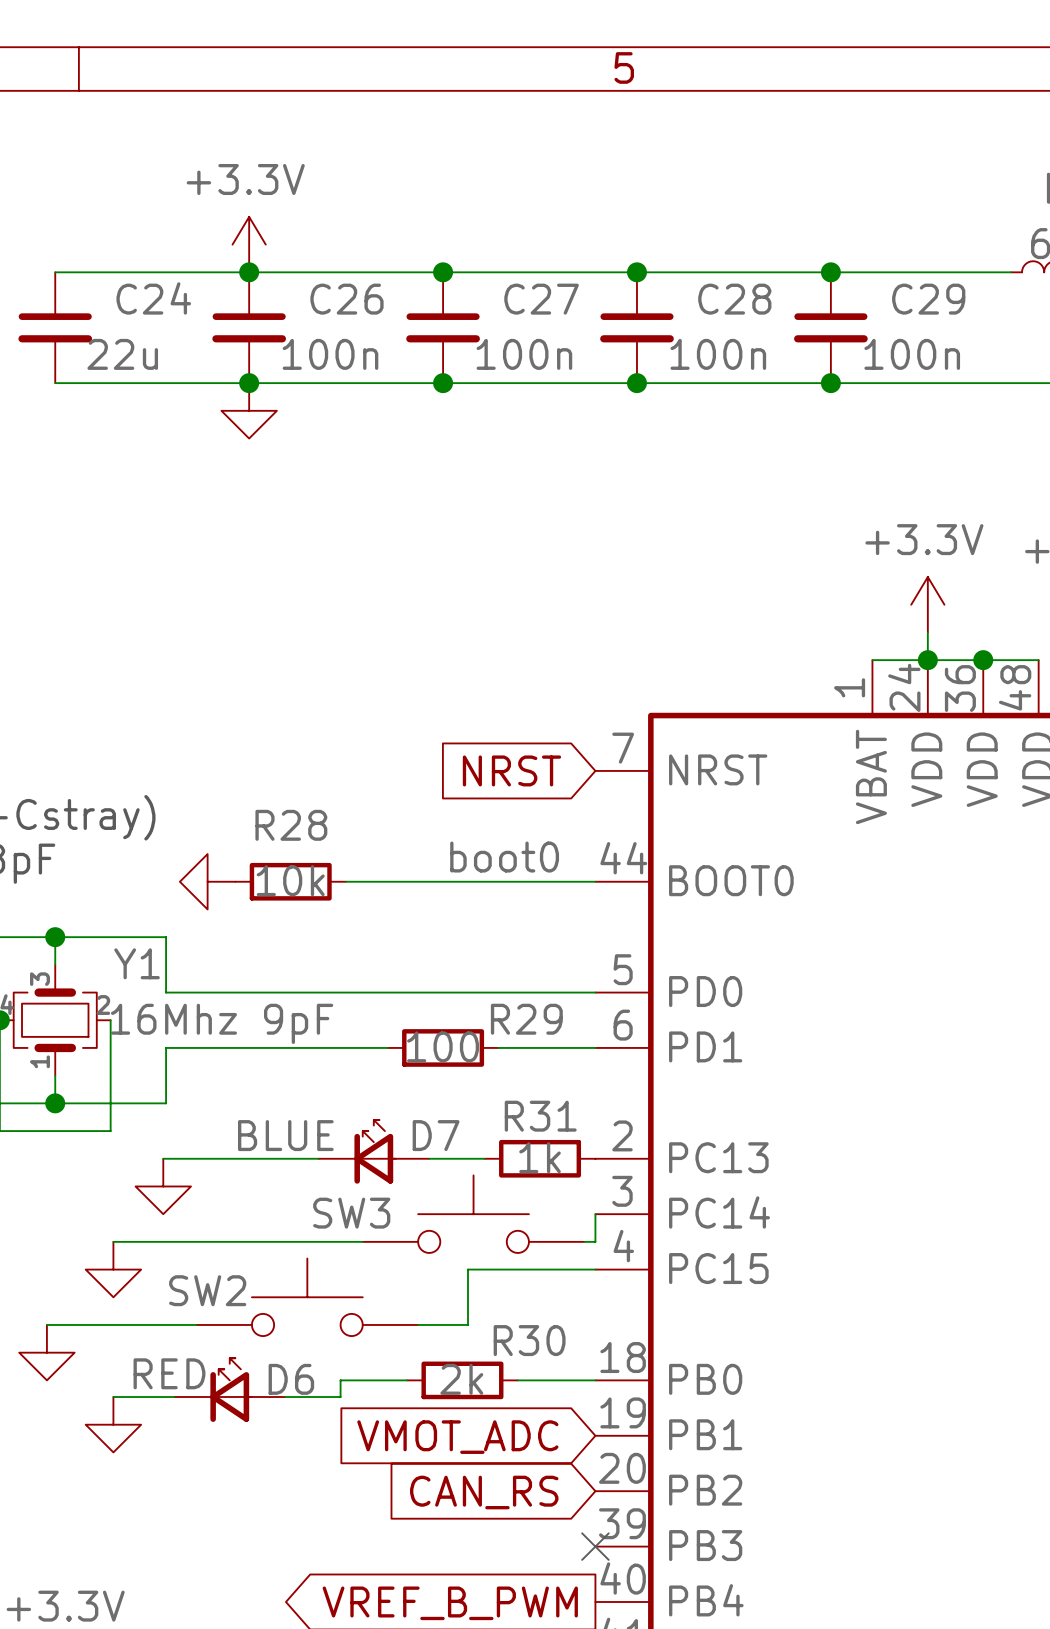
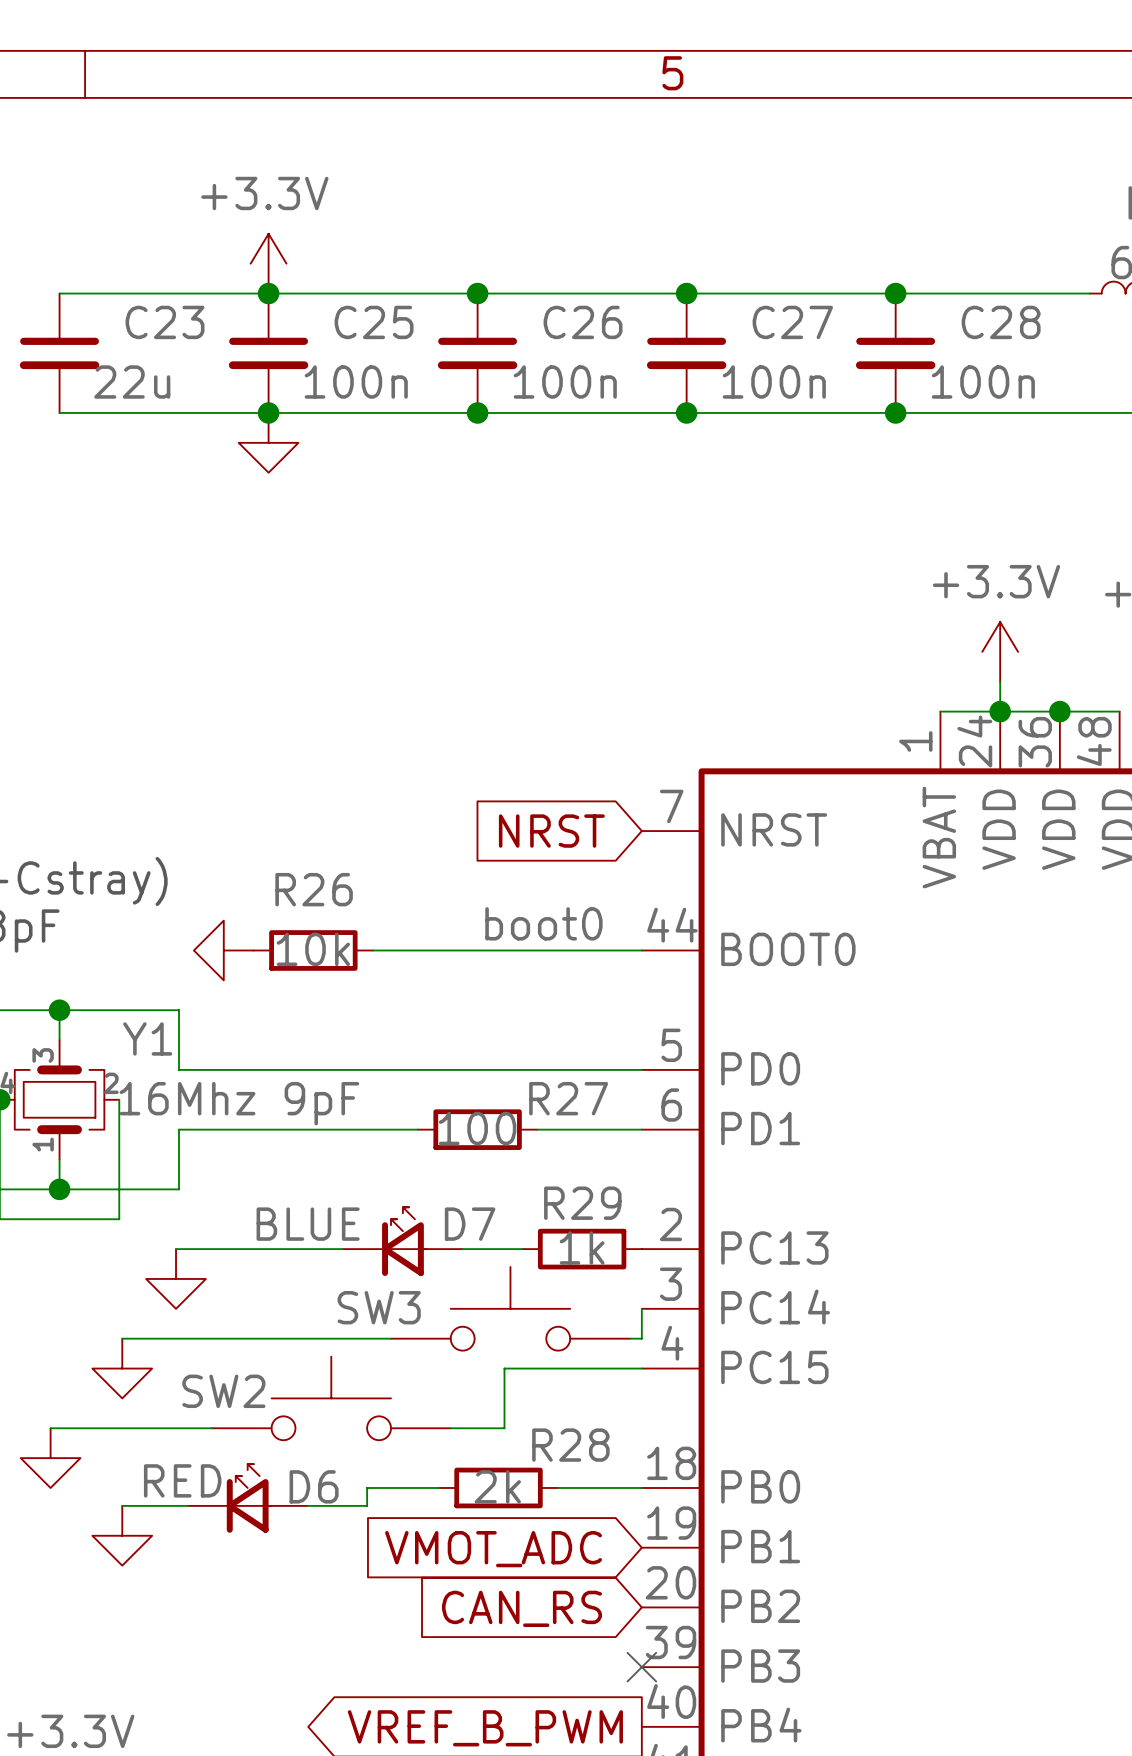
C24 name: C24 (153, 298) -> C23 (165, 322)
C26 name: C26 (346, 299) -> C25 (374, 322)
C27 name: C27 (541, 299) -> C26 (583, 322)
C28 name: C28 (734, 299) -> C27 (792, 322)
C29 name: C29 (928, 299) -> C28 (1001, 322)
R28 name: R28 (291, 825) -> R26 (314, 889)
R29 name: R29 (526, 1019) -> R27 (568, 1098)
R31 name: R31 (540, 1116) -> R29 (582, 1203)
R30 name: R30 (529, 1340) -> R28 (570, 1445)

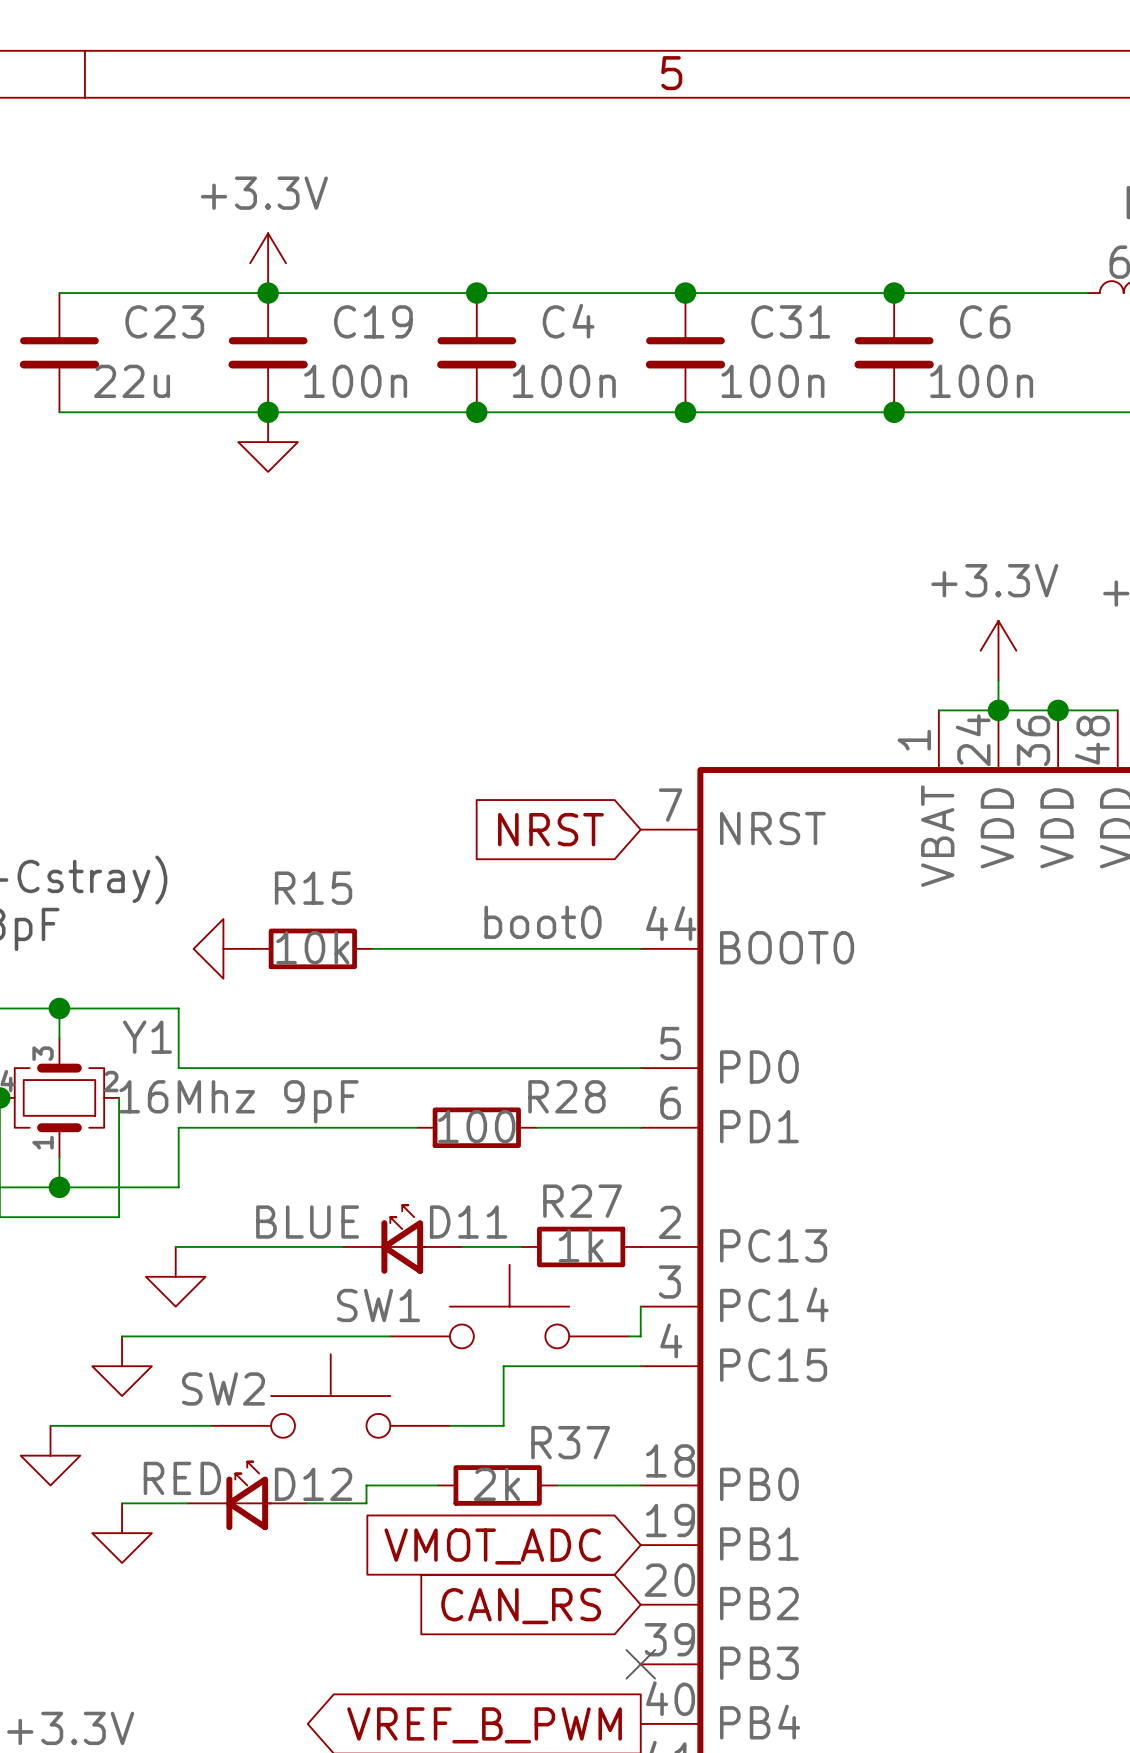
C25 name: C25 (374, 322) -> C19 (373, 321)
C26 name: C26 (583, 322) -> C4 (568, 321)
C27 name: C27 (792, 322) -> C31 (790, 321)
C28 name: C28 (1001, 322) -> C6 (985, 321)
R26 name: R26 (314, 889) -> R15 (313, 888)
R27 name: R27 (568, 1098) -> R28 (566, 1096)
R29 name: R29 (582, 1203) -> R27 (582, 1201)
D7 name: D7 (470, 1224) -> D11 (468, 1222)
SW3 name: SW3 (379, 1307) -> SW1 (378, 1305)
R28 name: R28 (570, 1445) -> R37 (570, 1442)
D6 name: D6 (314, 1486) -> D12 (313, 1484)

